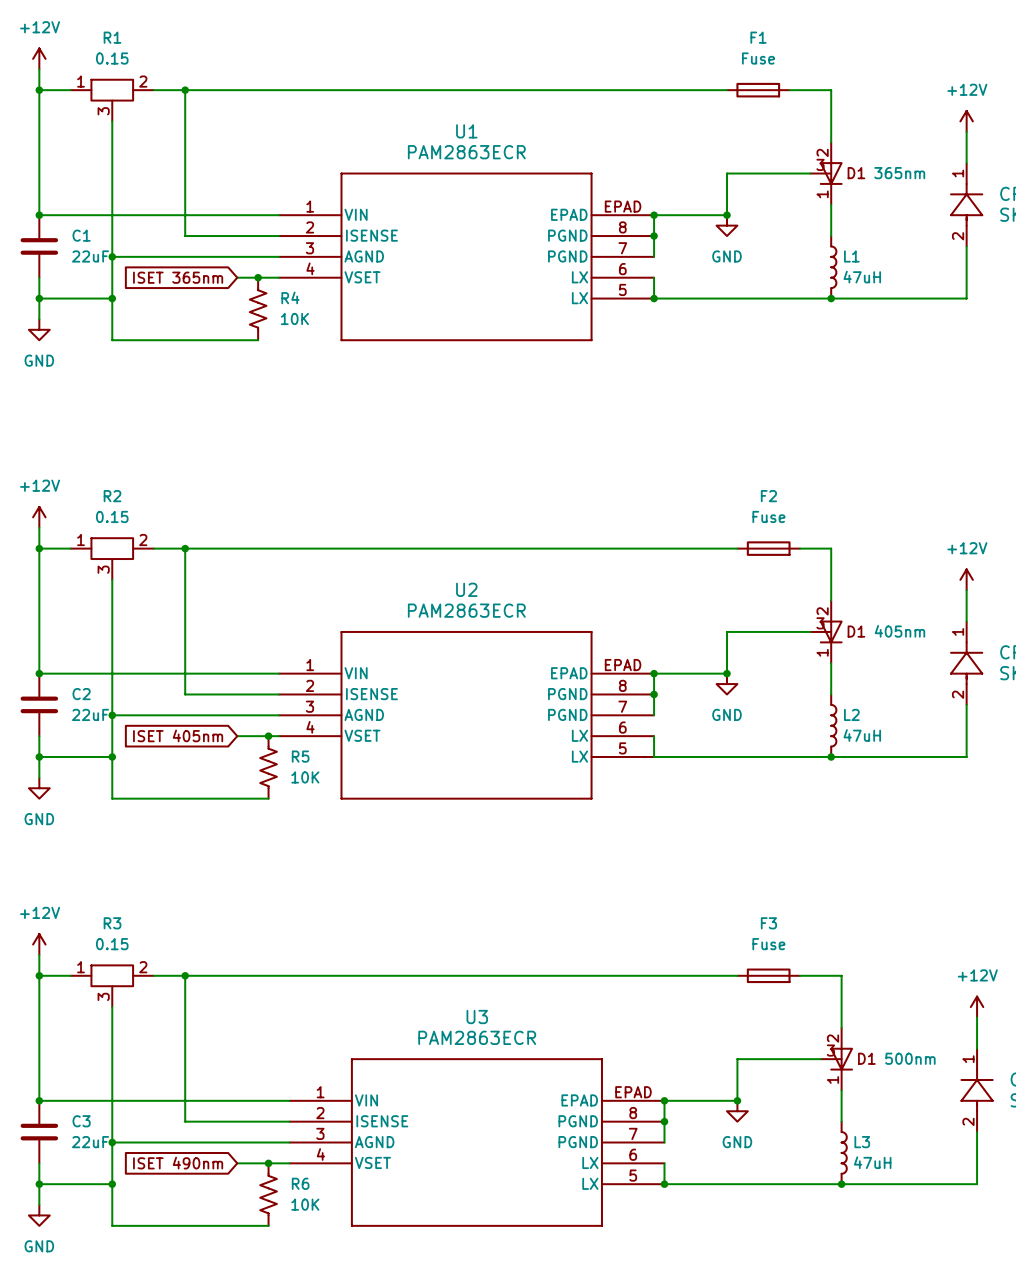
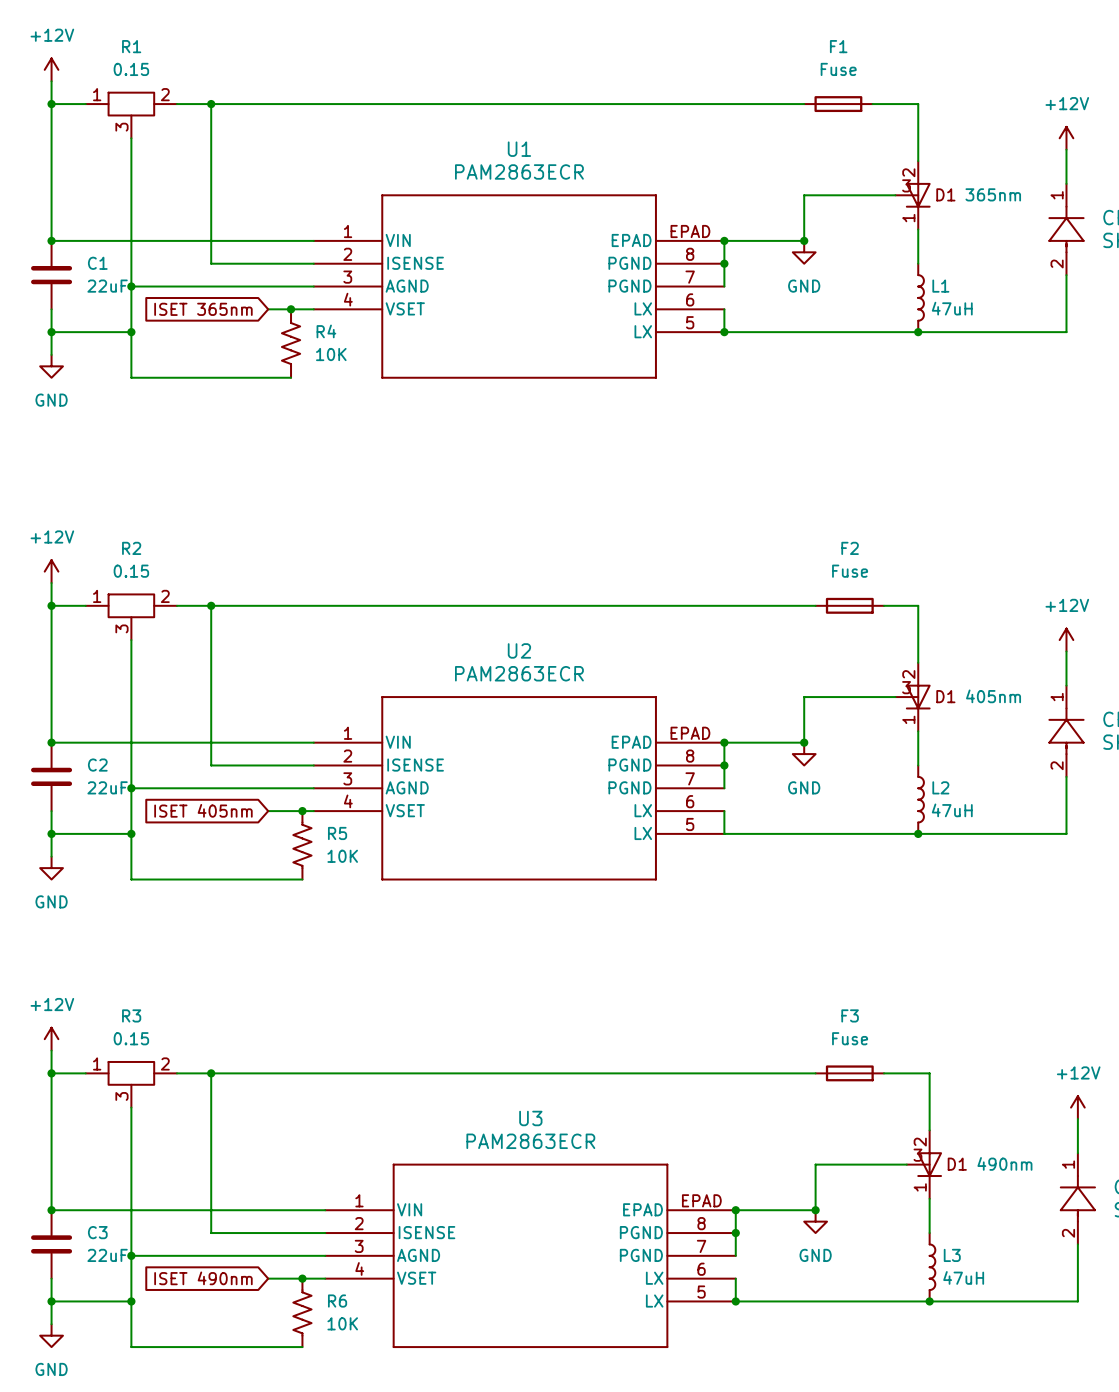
part value: 500nm (910, 1058) -> 490nm (1004, 1163)

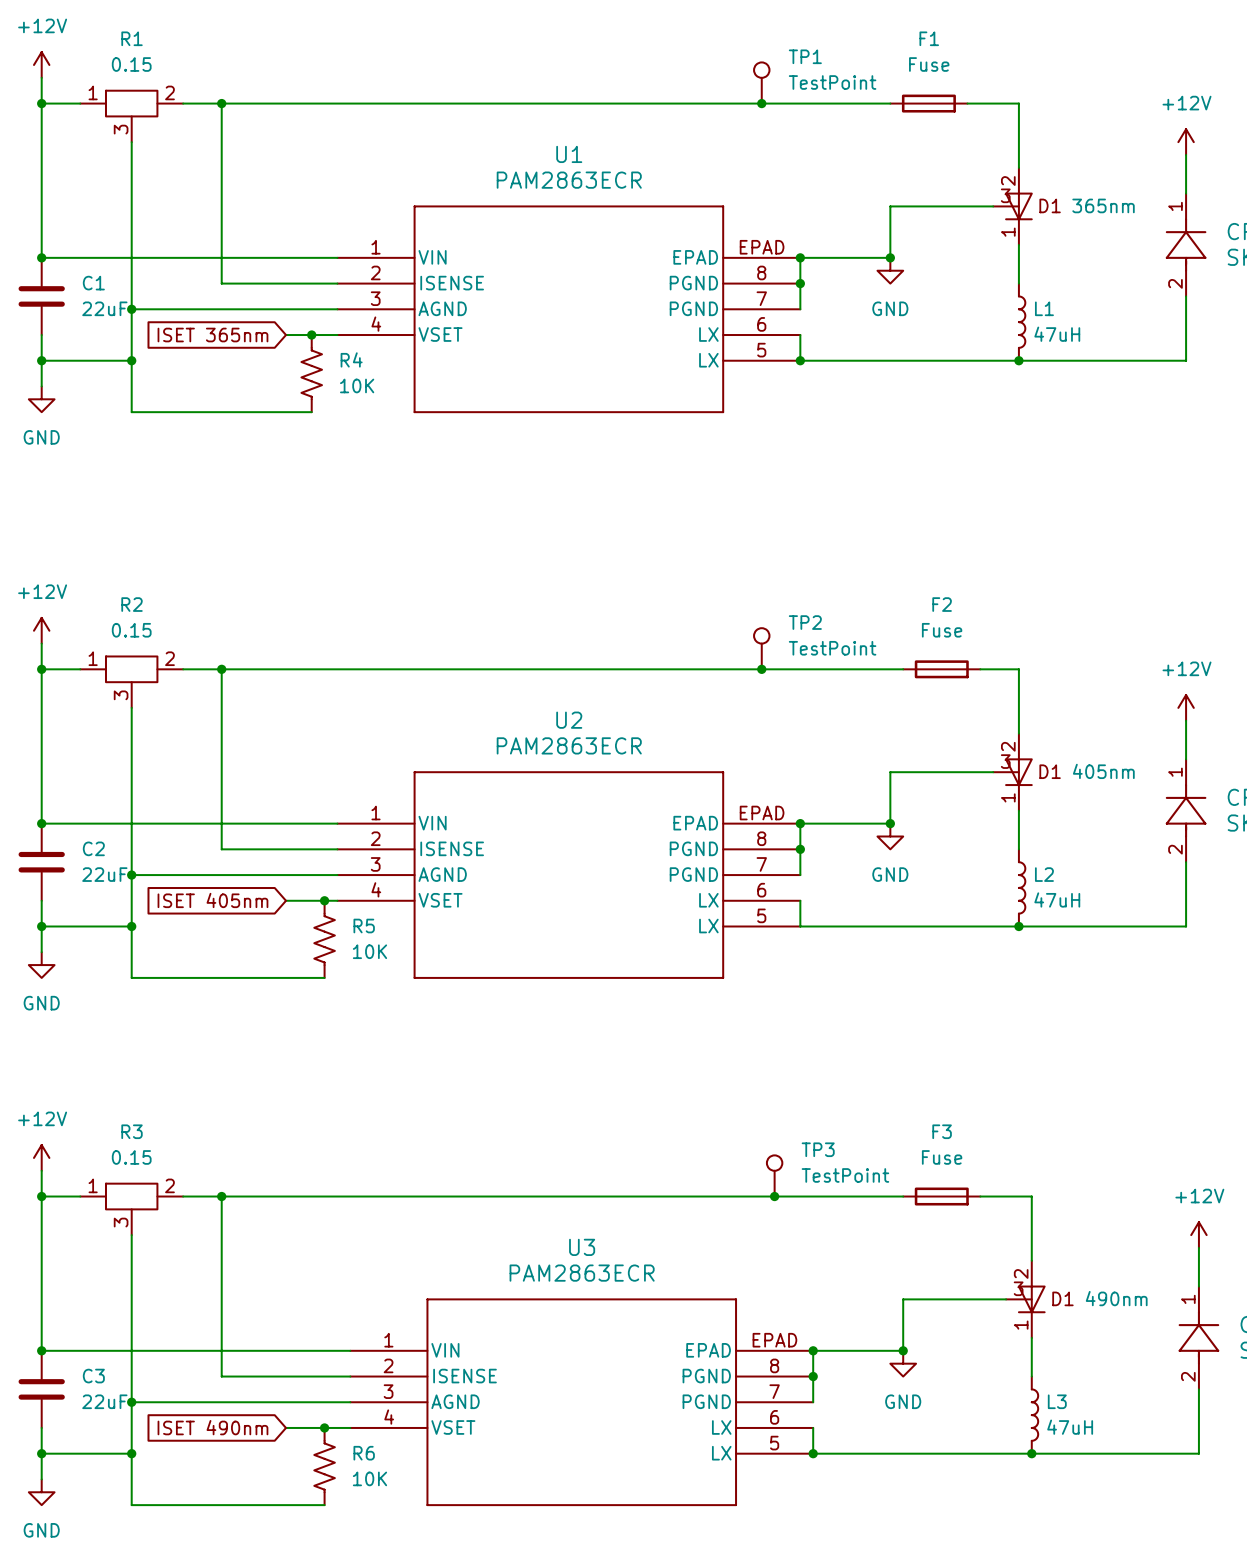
TP1: none -> TestPoint (761, 82)
junction: none -> (761, 103)
TP2: none -> TestPoint (761, 648)
junction: none -> (761, 669)
TP3: none -> TestPoint (774, 1175)
junction: none -> (774, 1196)

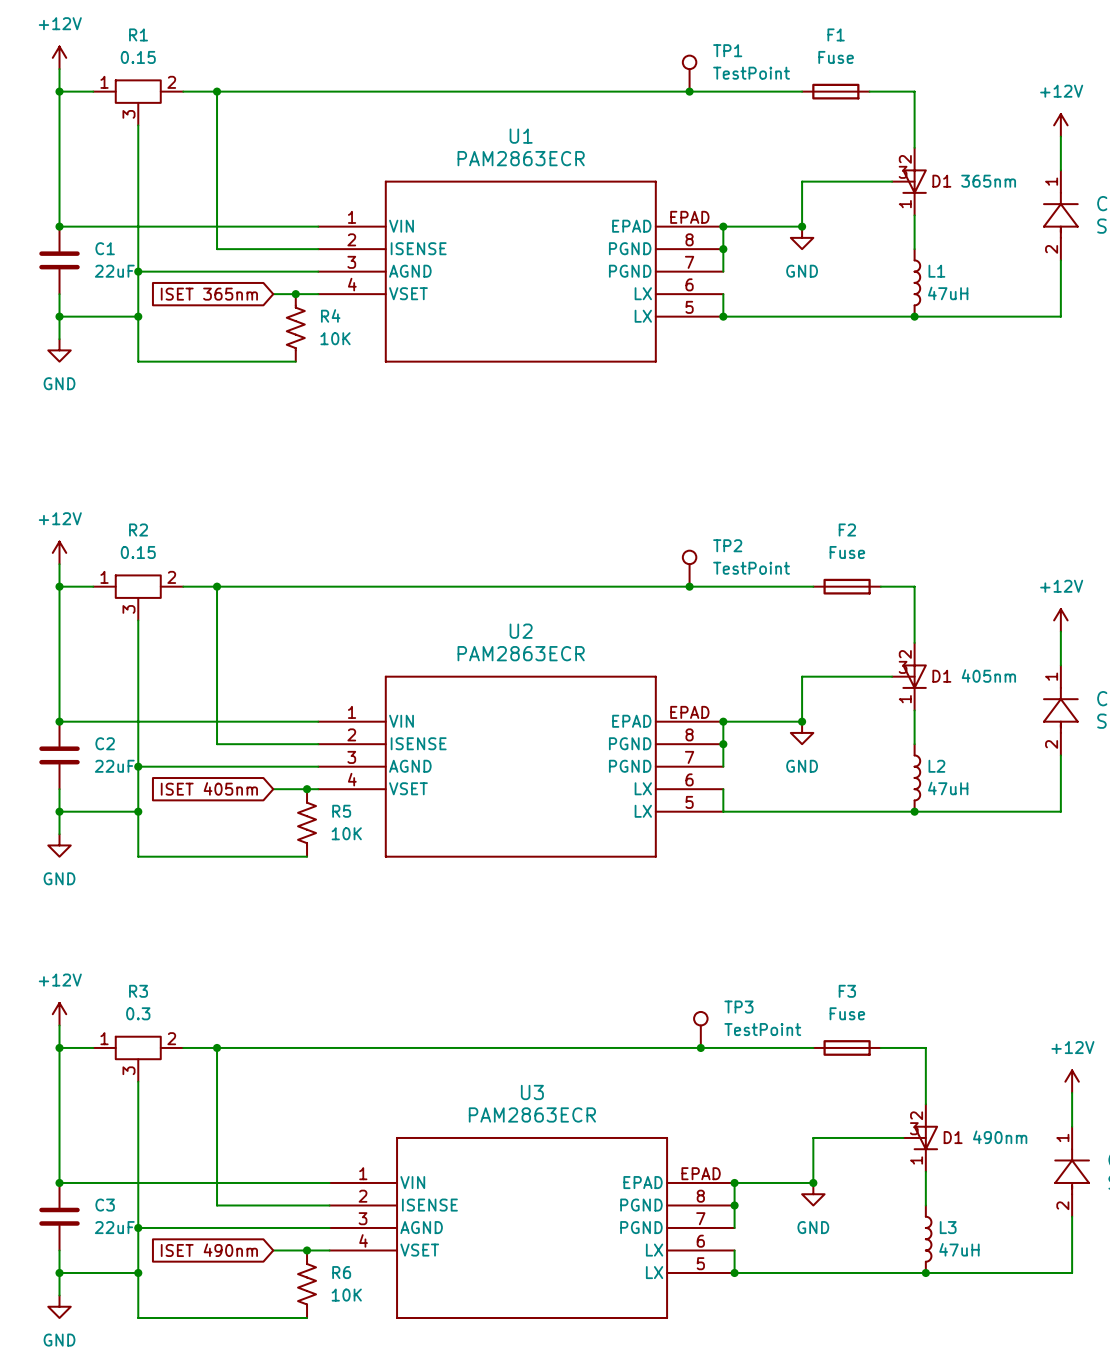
R3 value: 0.15 (131, 1157) -> 0.3 (138, 1013)

